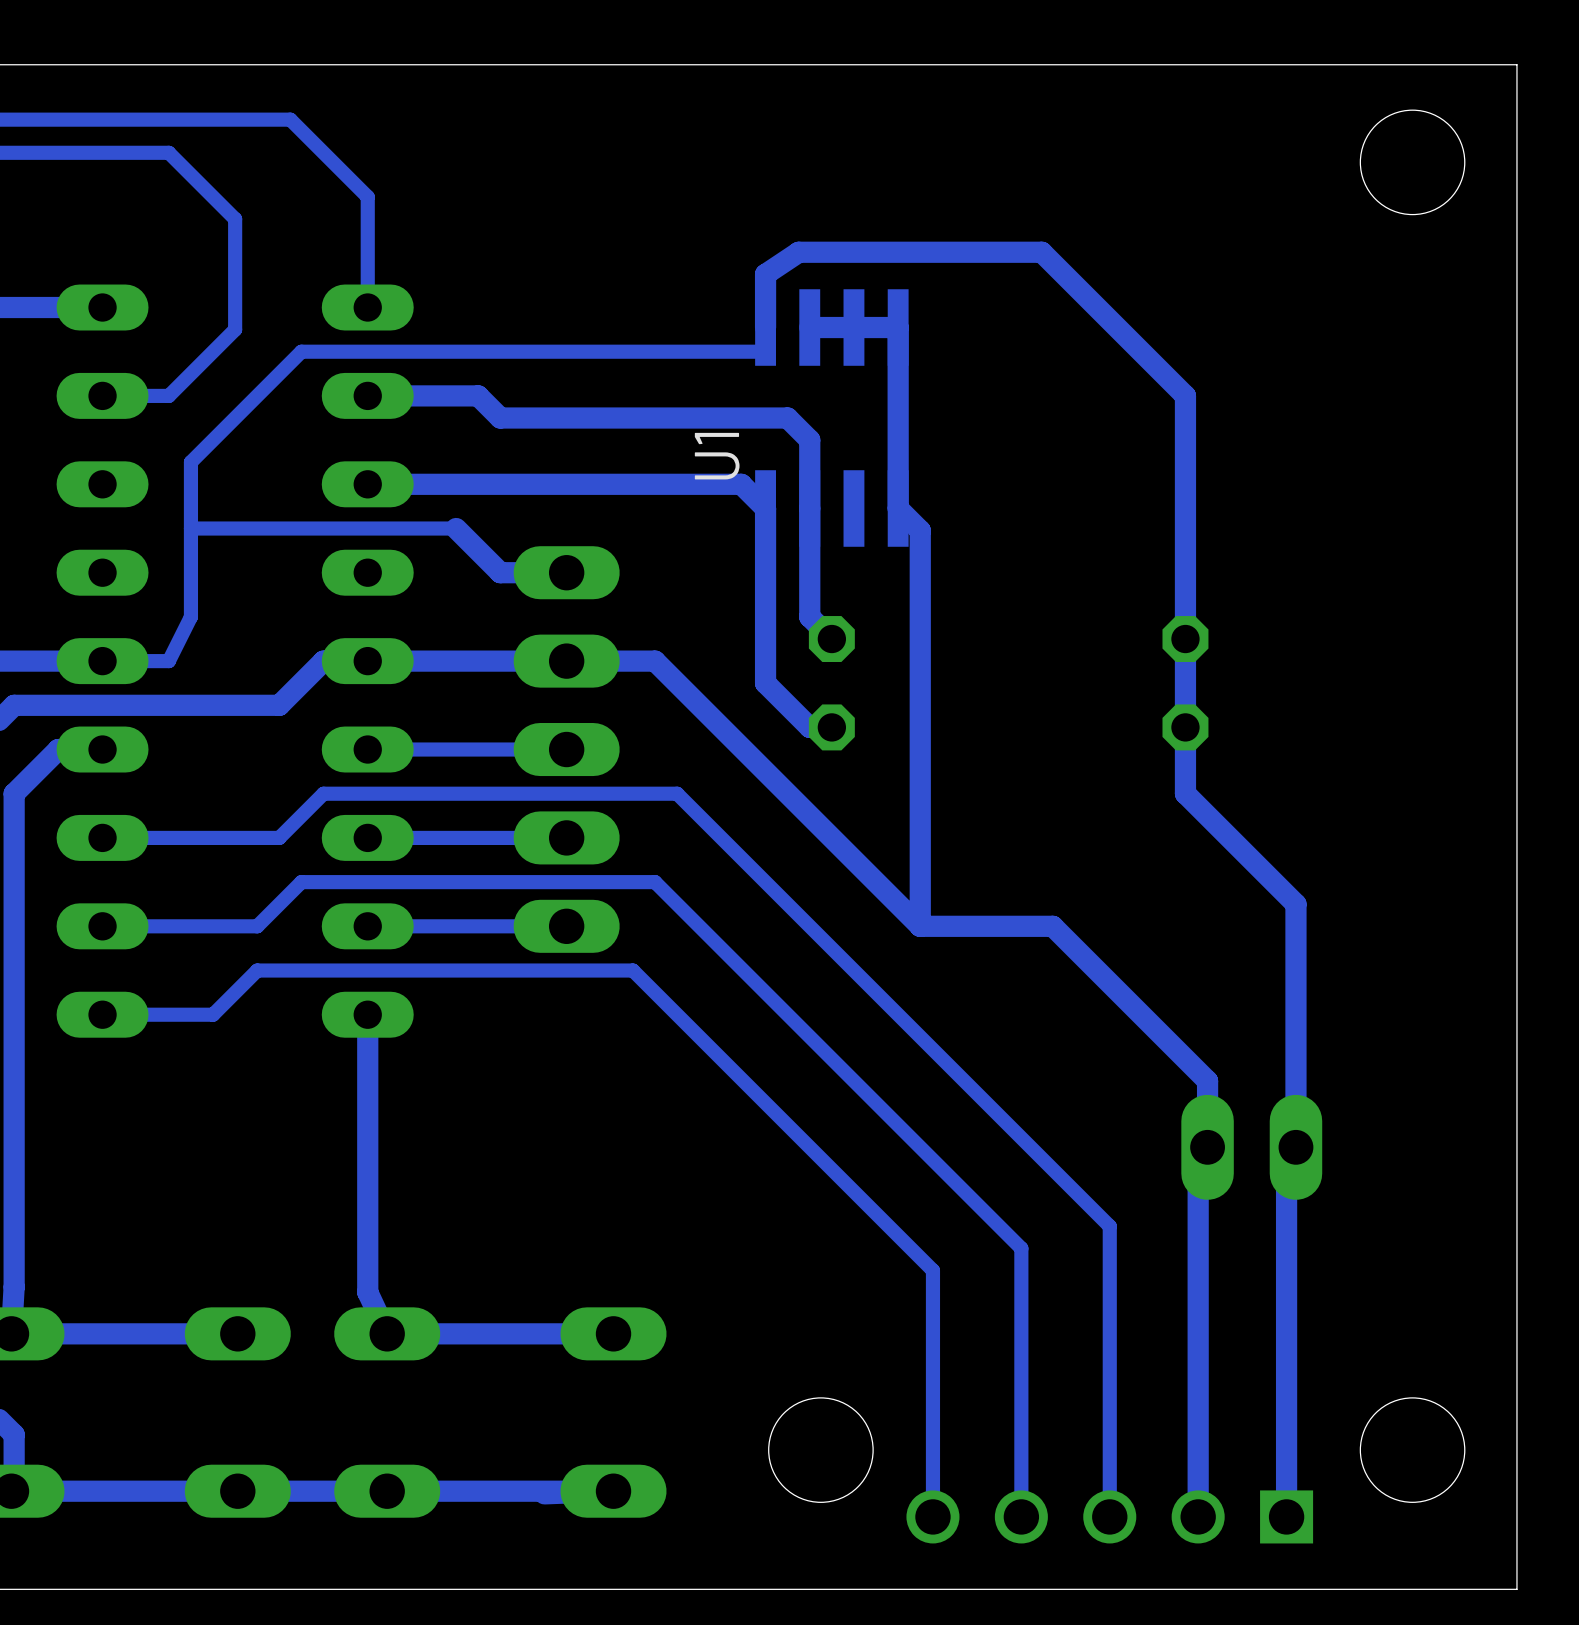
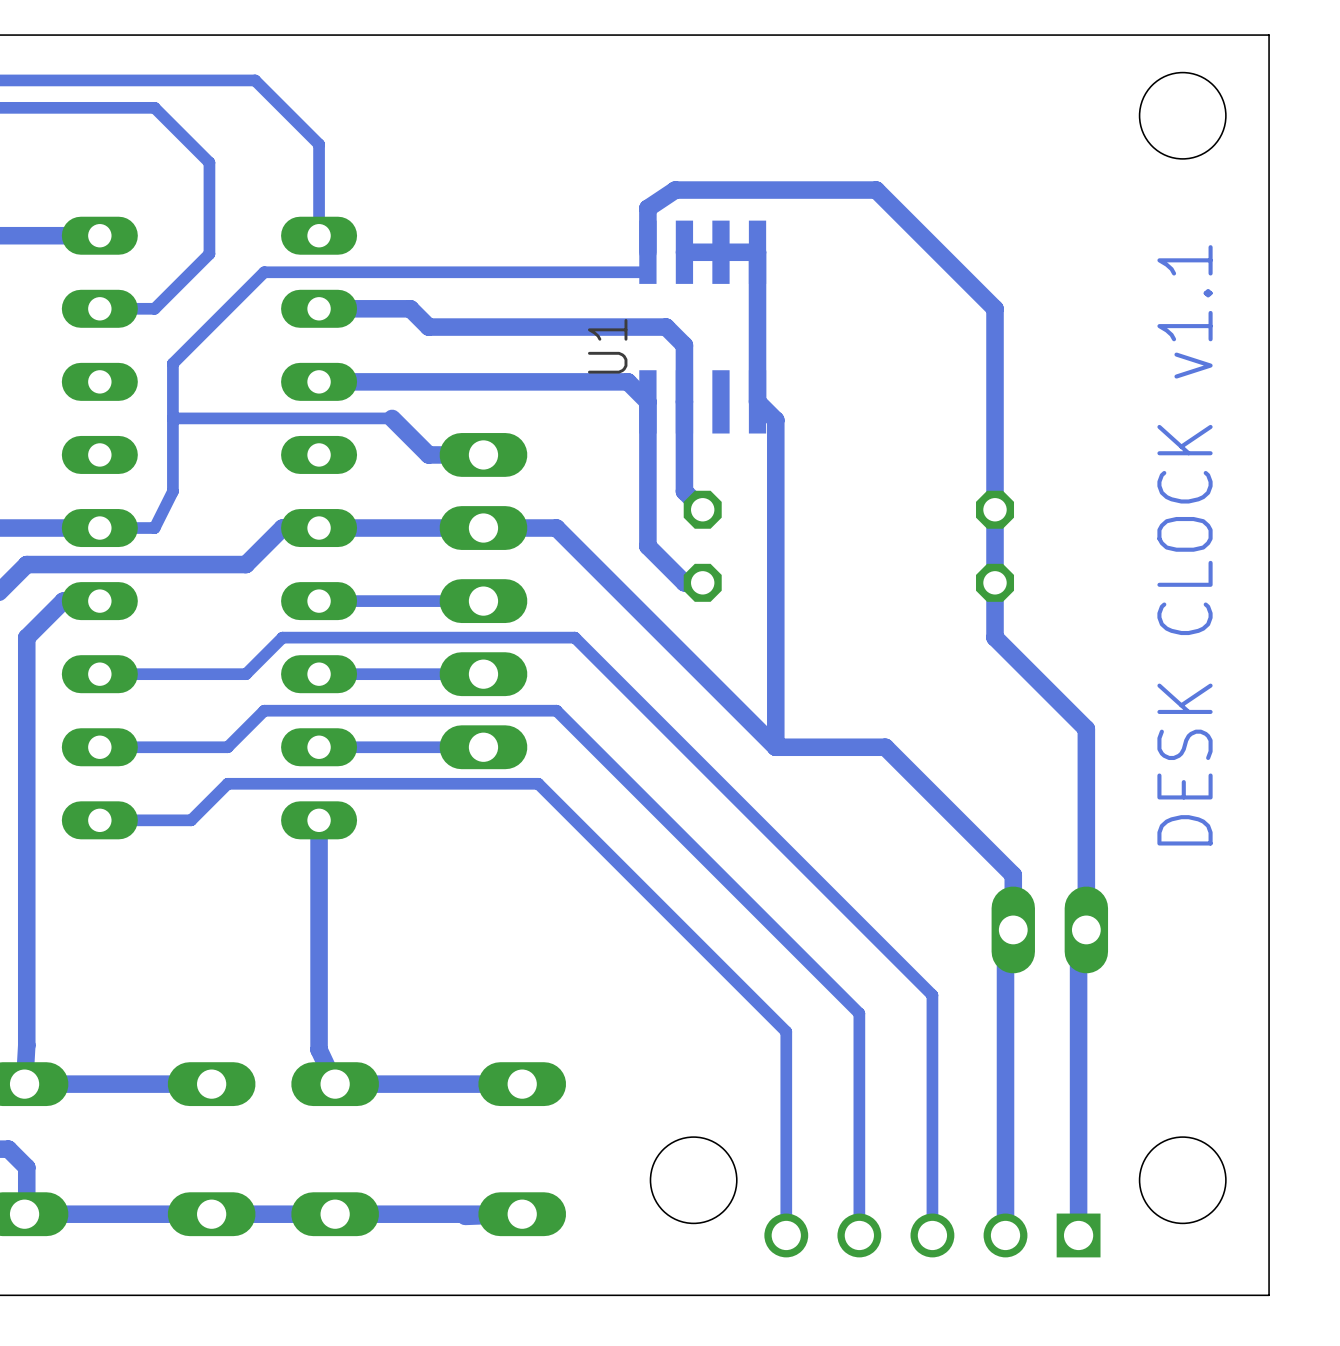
text: none -> DESK CLOCK v1.1 (1185, 545)

